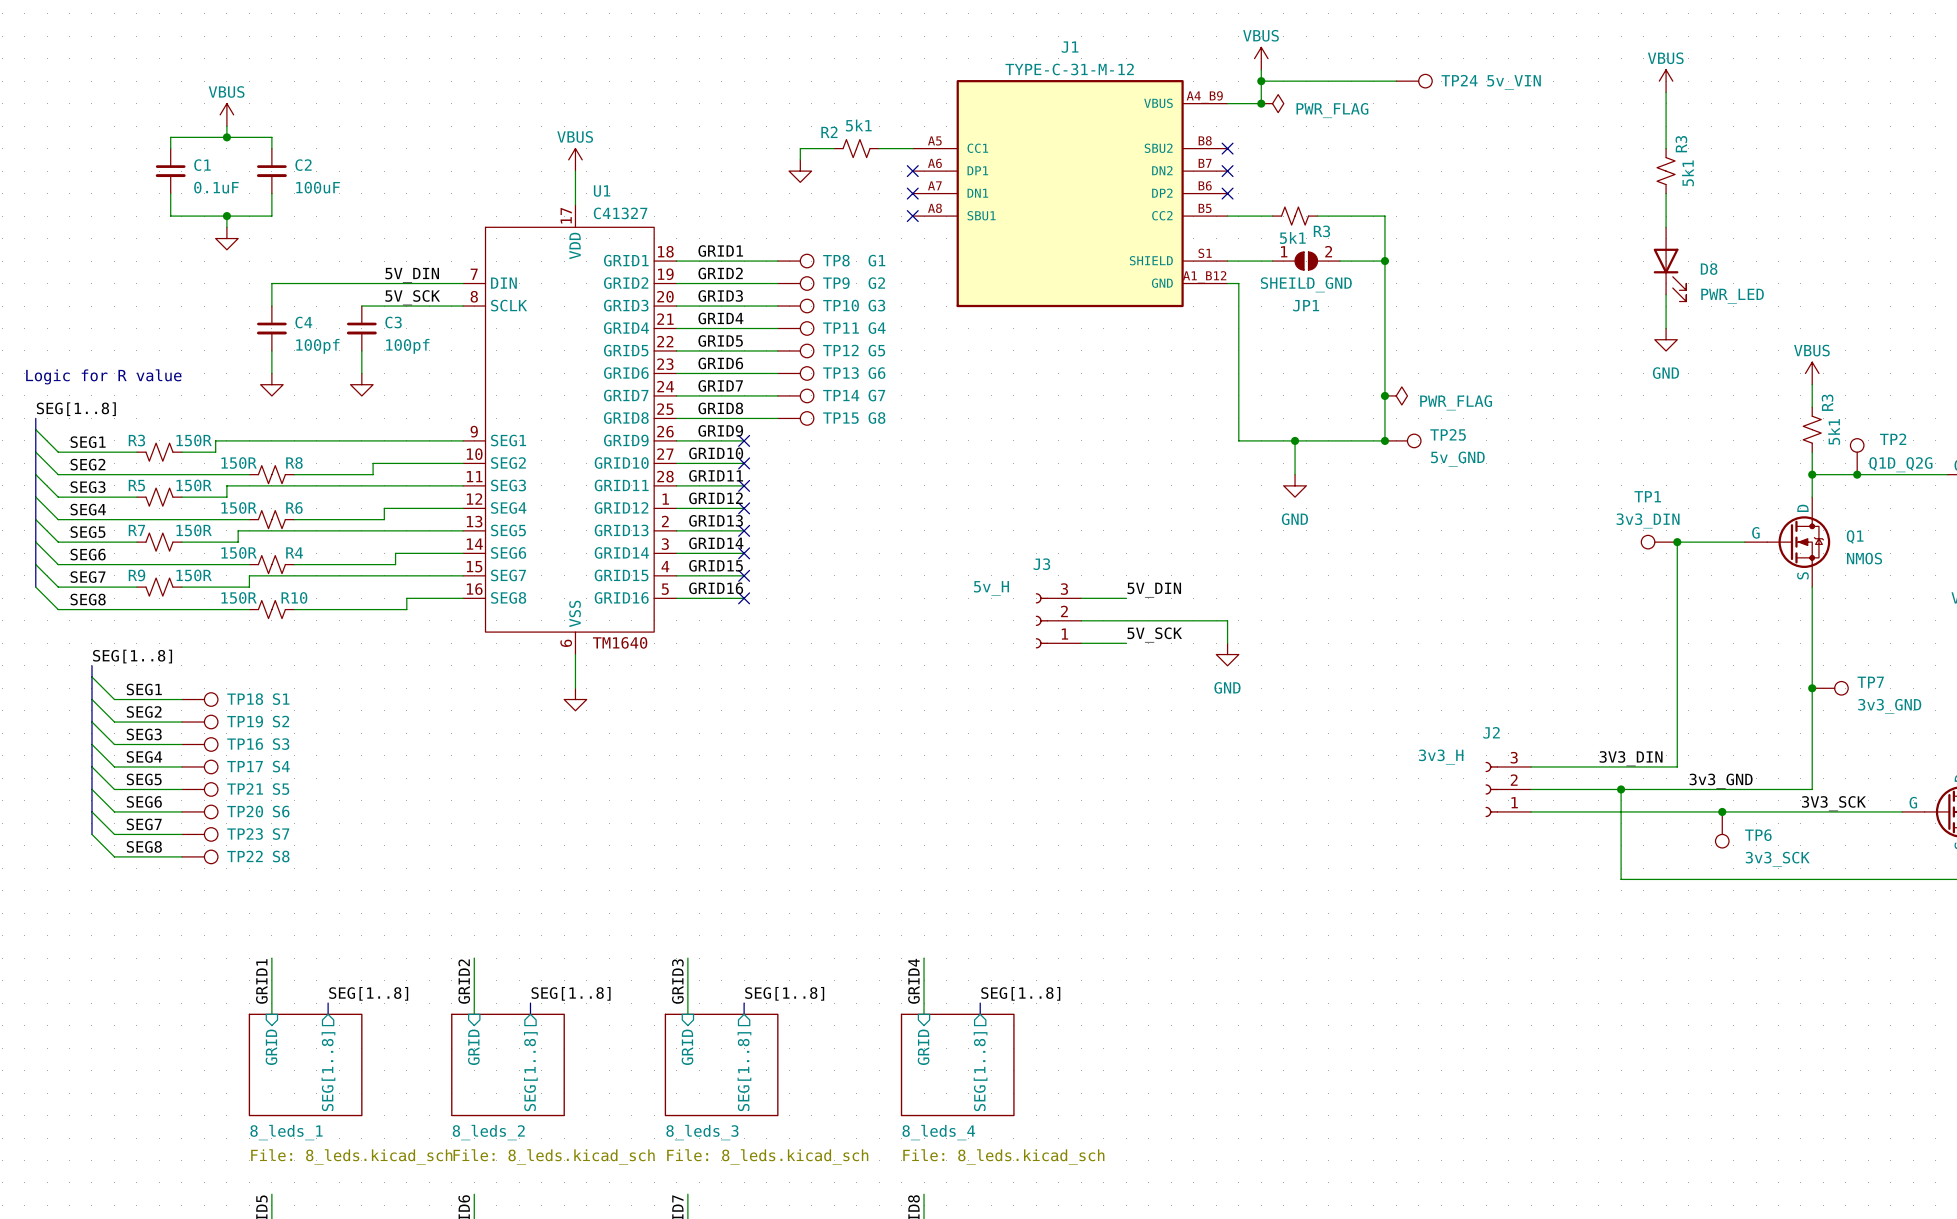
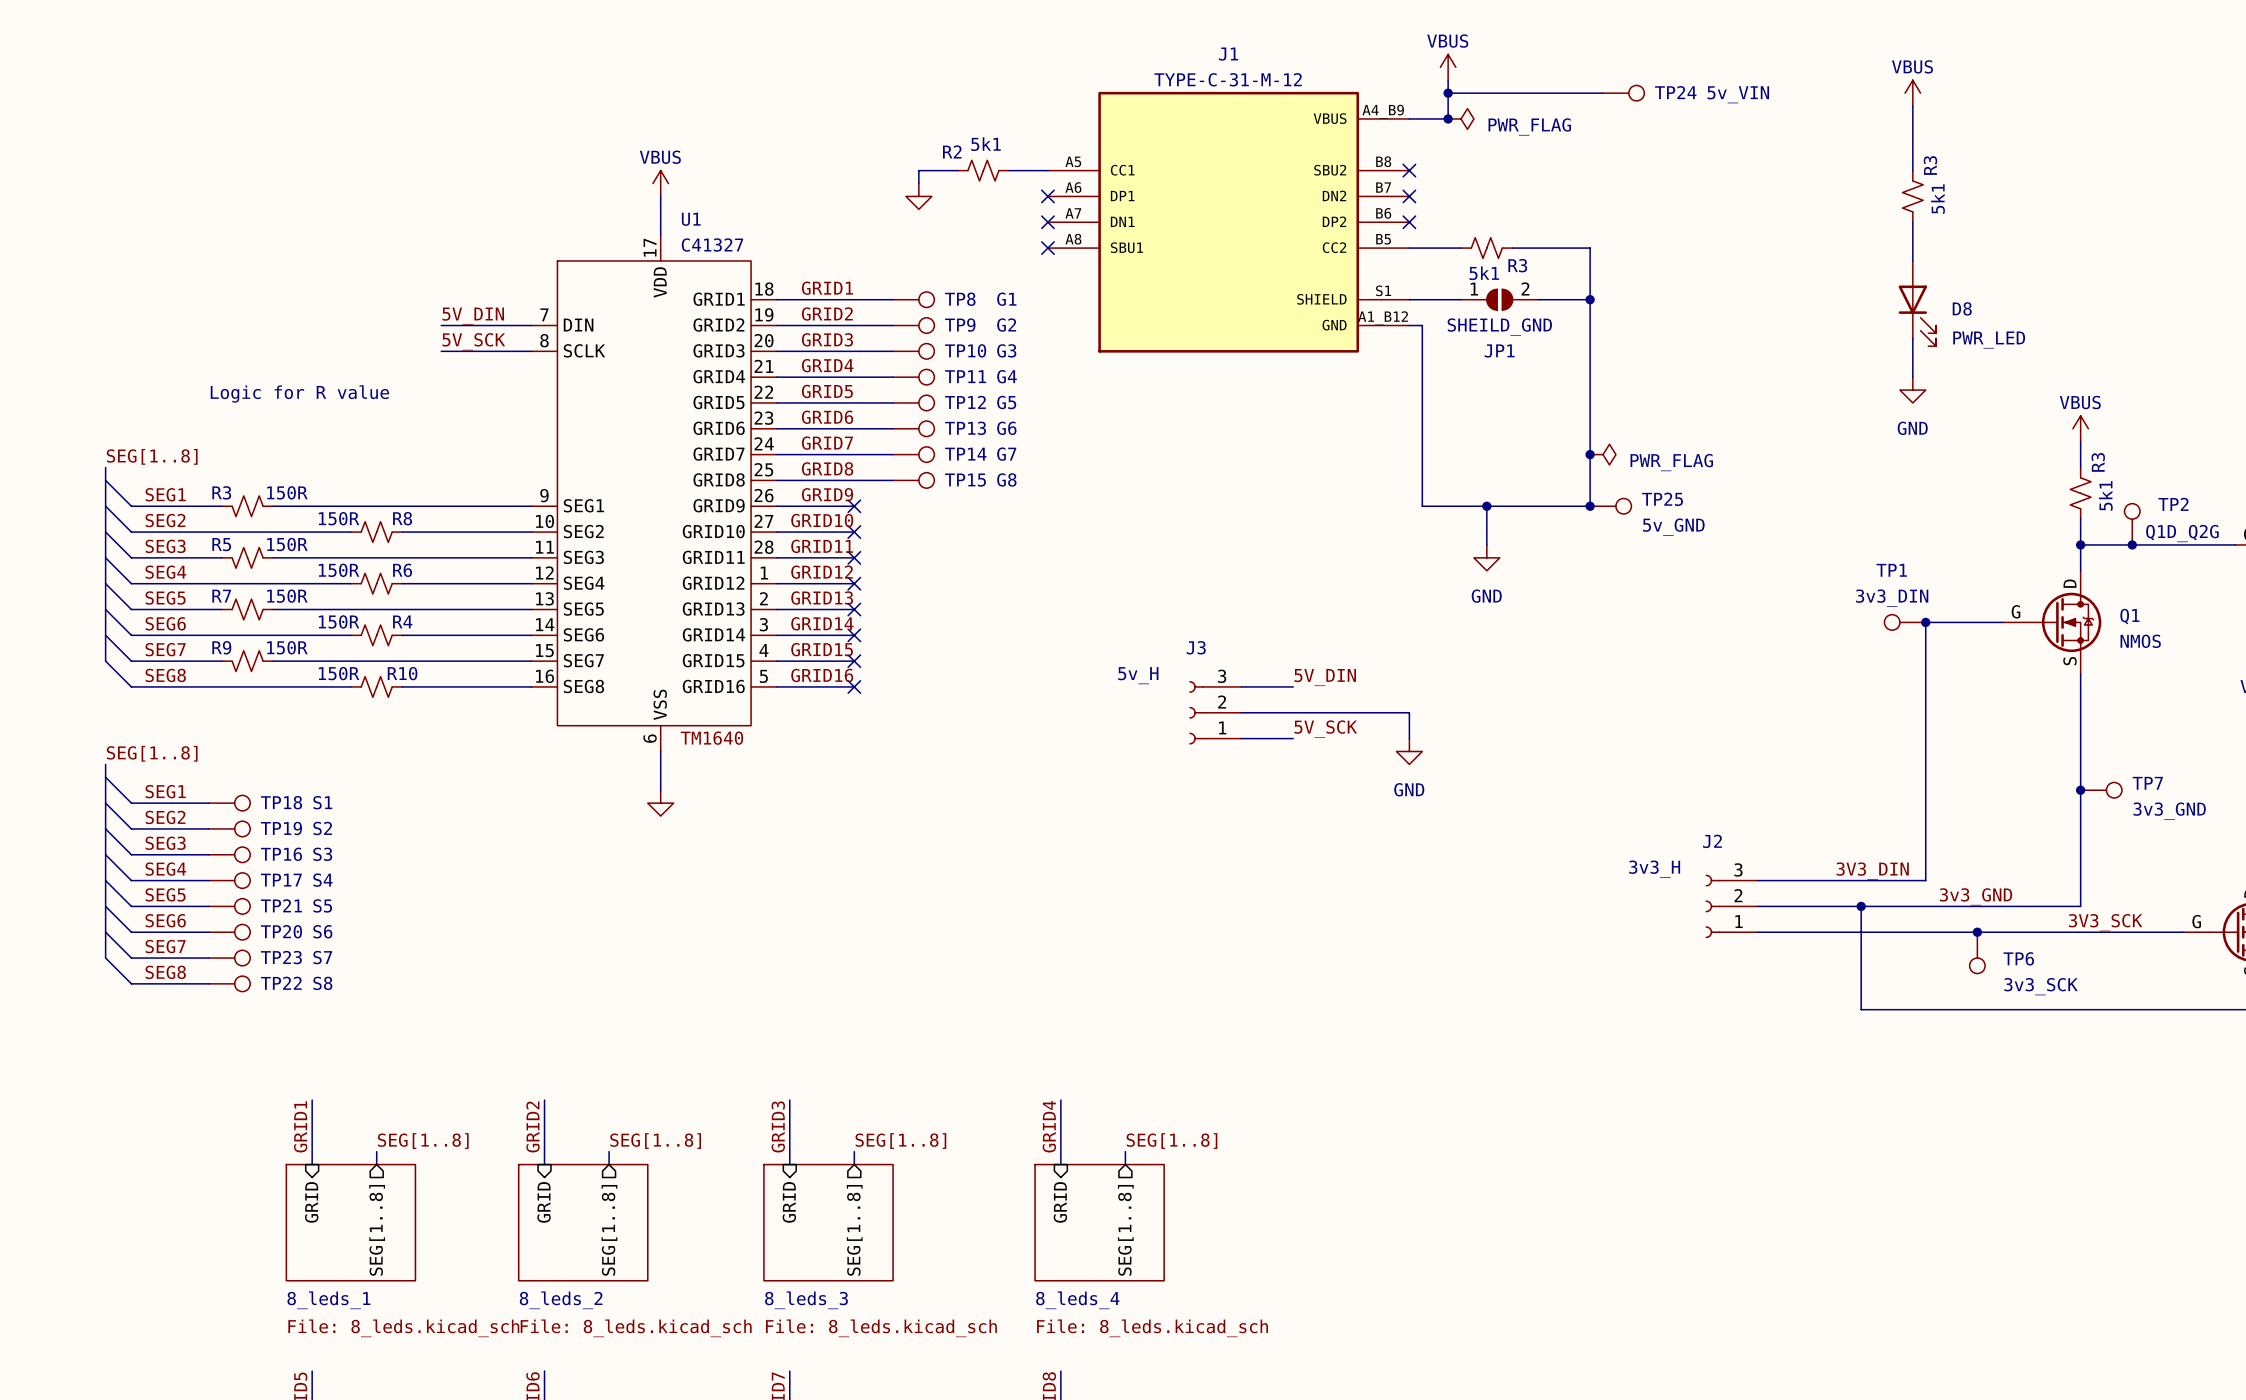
power symbol: VBUS (226, 114) -> none
wire: (226, 126) (226, 137) -> none
junction: (226, 137) -> none
wire: (170, 148) (170, 137) (271, 137) (271, 148) -> none
C1: 0.1uF (170, 171) -> none
C2: 100uF (271, 171) -> none
wire: (170, 193) (170, 216) (271, 216) (271, 193) -> none
wire: (226, 216) (226, 227) -> none
junction: (226, 216) -> none
power symbol: (226, 238) -> none
wire: (384, 283) (271, 283) (271, 306) -> none
wire: (361, 306) (384, 306) -> none
C4: 100pf (271, 328) -> none
C3: 100pf (361, 328) -> none
wire: (271, 350) (271, 373) -> none
wire: (361, 350) (361, 373) -> none
text position: Logic for R value (103, 376) -> Logic for R value (299, 393)
power symbol: (271, 384) -> none
power symbol: (361, 384) -> none
label position: SEG[1..8] (76, 409) -> SEG[1..8] (152, 456)
bus: (35, 418) (35, 587) -> (105, 467) (105, 661)
wire: (35, 429) (58, 452) (136, 452) -> (105, 480) (131, 506) (221, 506)
wire: (238, 440) (215, 440) (215, 452) (181, 452) -> none
label position: SEG1 (88, 442) -> SEG1 (165, 494)
wire: (35, 452) (58, 474) (249, 474) -> (105, 506) (131, 532) (350, 532)
R3 position: (159, 452) -> (247, 506)
wire: (373, 463) (373, 474) (294, 474) -> (428, 532) (402, 532)
label position: SEG2 (87, 464) -> SEG2 (165, 520)
wire: (35, 474) (58, 497) (136, 497) -> (105, 532) (131, 557) (221, 557)
R8 position: (271, 474) -> (376, 532)
wire: (238, 485) (226, 485) (226, 497) (181, 497) -> none
label position: SEG3 (88, 487) -> SEG3 (165, 546)
wire: (35, 497) (58, 519) (249, 519) -> (105, 557) (131, 583) (350, 583)
R5 position: (159, 497) -> (247, 557)
wire: (384, 508) (384, 519) (294, 519) -> (441, 583) (402, 583)
label position: SEG4 (88, 509) -> SEG4 (165, 572)
wire: (35, 519) (58, 542) (136, 542) -> (105, 583) (131, 609) (221, 609)
R6 position: (271, 519) -> (376, 583)
wire: (238, 530) (238, 542) (181, 542) -> none
label position: SEG5 (87, 532) -> SEG5 (165, 598)
wire: (35, 542) (58, 564) (249, 564) -> (105, 609) (131, 635) (350, 635)
R7 position: (159, 542) -> (247, 609)
wire: (395, 553) (395, 564) (294, 564) -> (454, 635) (402, 635)
label position: SEG6 (88, 554) -> SEG6 (165, 623)
wire: (35, 564) (58, 587) (136, 587) -> (105, 635) (131, 661) (221, 661)
R4 position: (271, 564) -> (376, 635)
wire: (249, 575) (249, 587) (181, 587) -> (286, 661) (273, 661)
label position: SEG7 (88, 577) -> SEG7 (165, 649)
wire: (35, 587) (58, 609) (249, 609) -> (105, 661) (131, 686) (350, 686)
R9 position: (159, 587) -> (247, 661)
wire: (406, 598) (406, 609) (294, 609) -> (467, 686) (402, 686)
label position: SEG8 (88, 599) -> SEG8 (165, 675)
R10 position: (271, 609) -> (376, 686)

